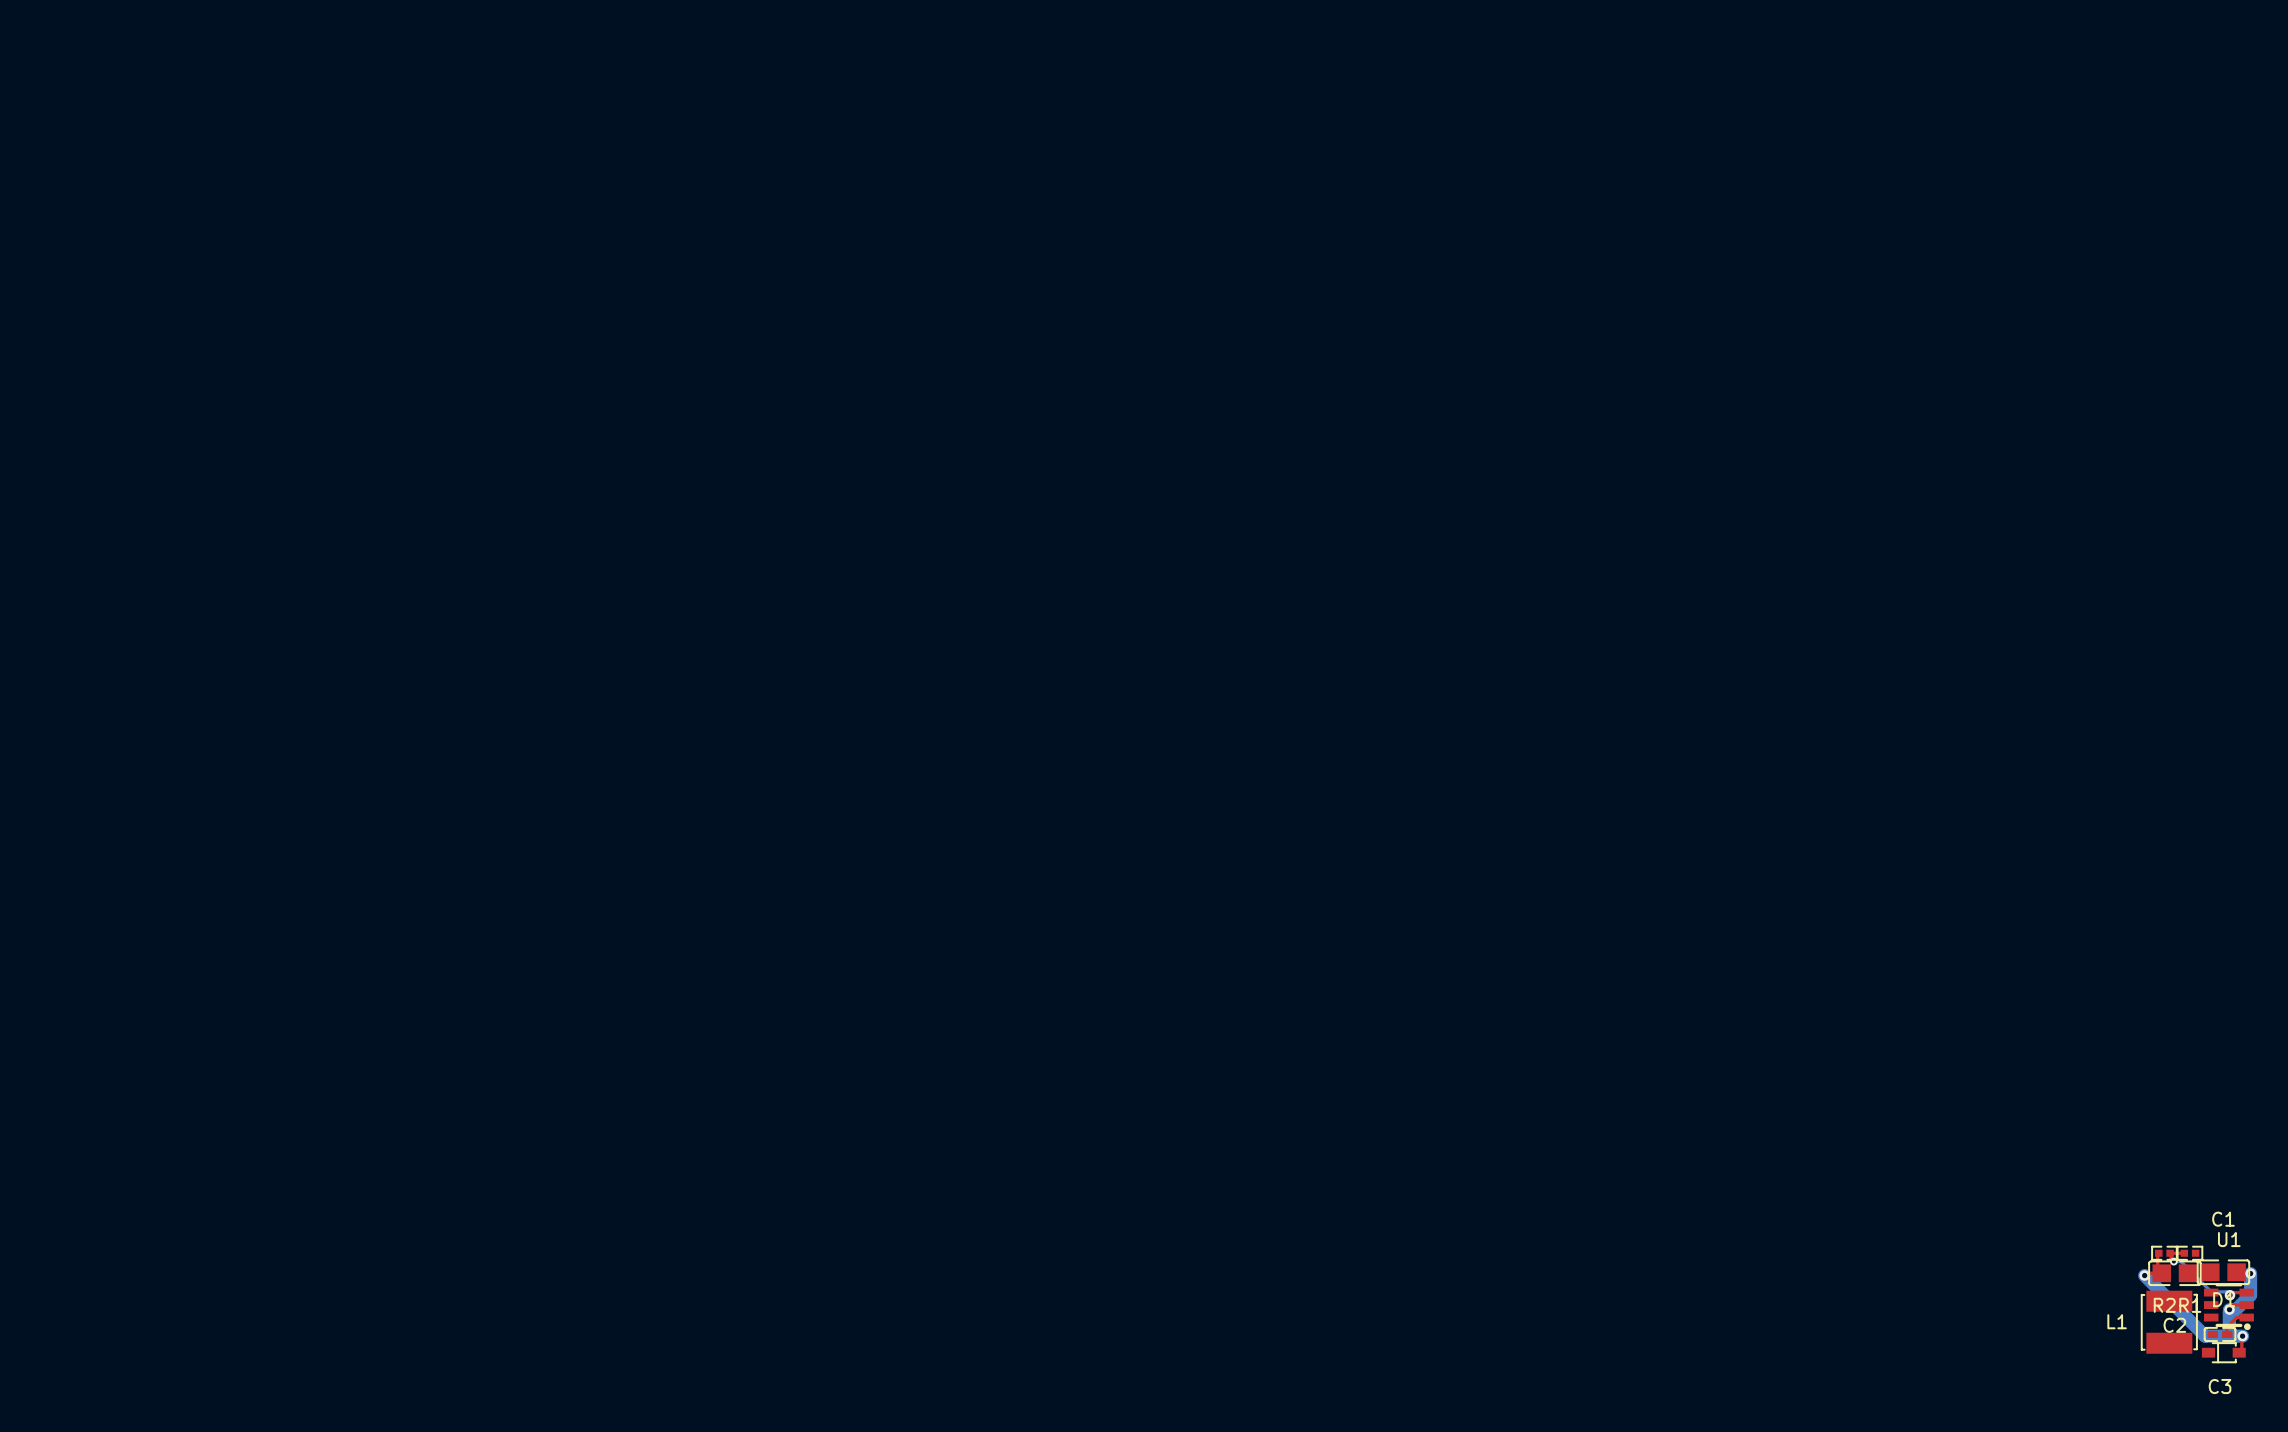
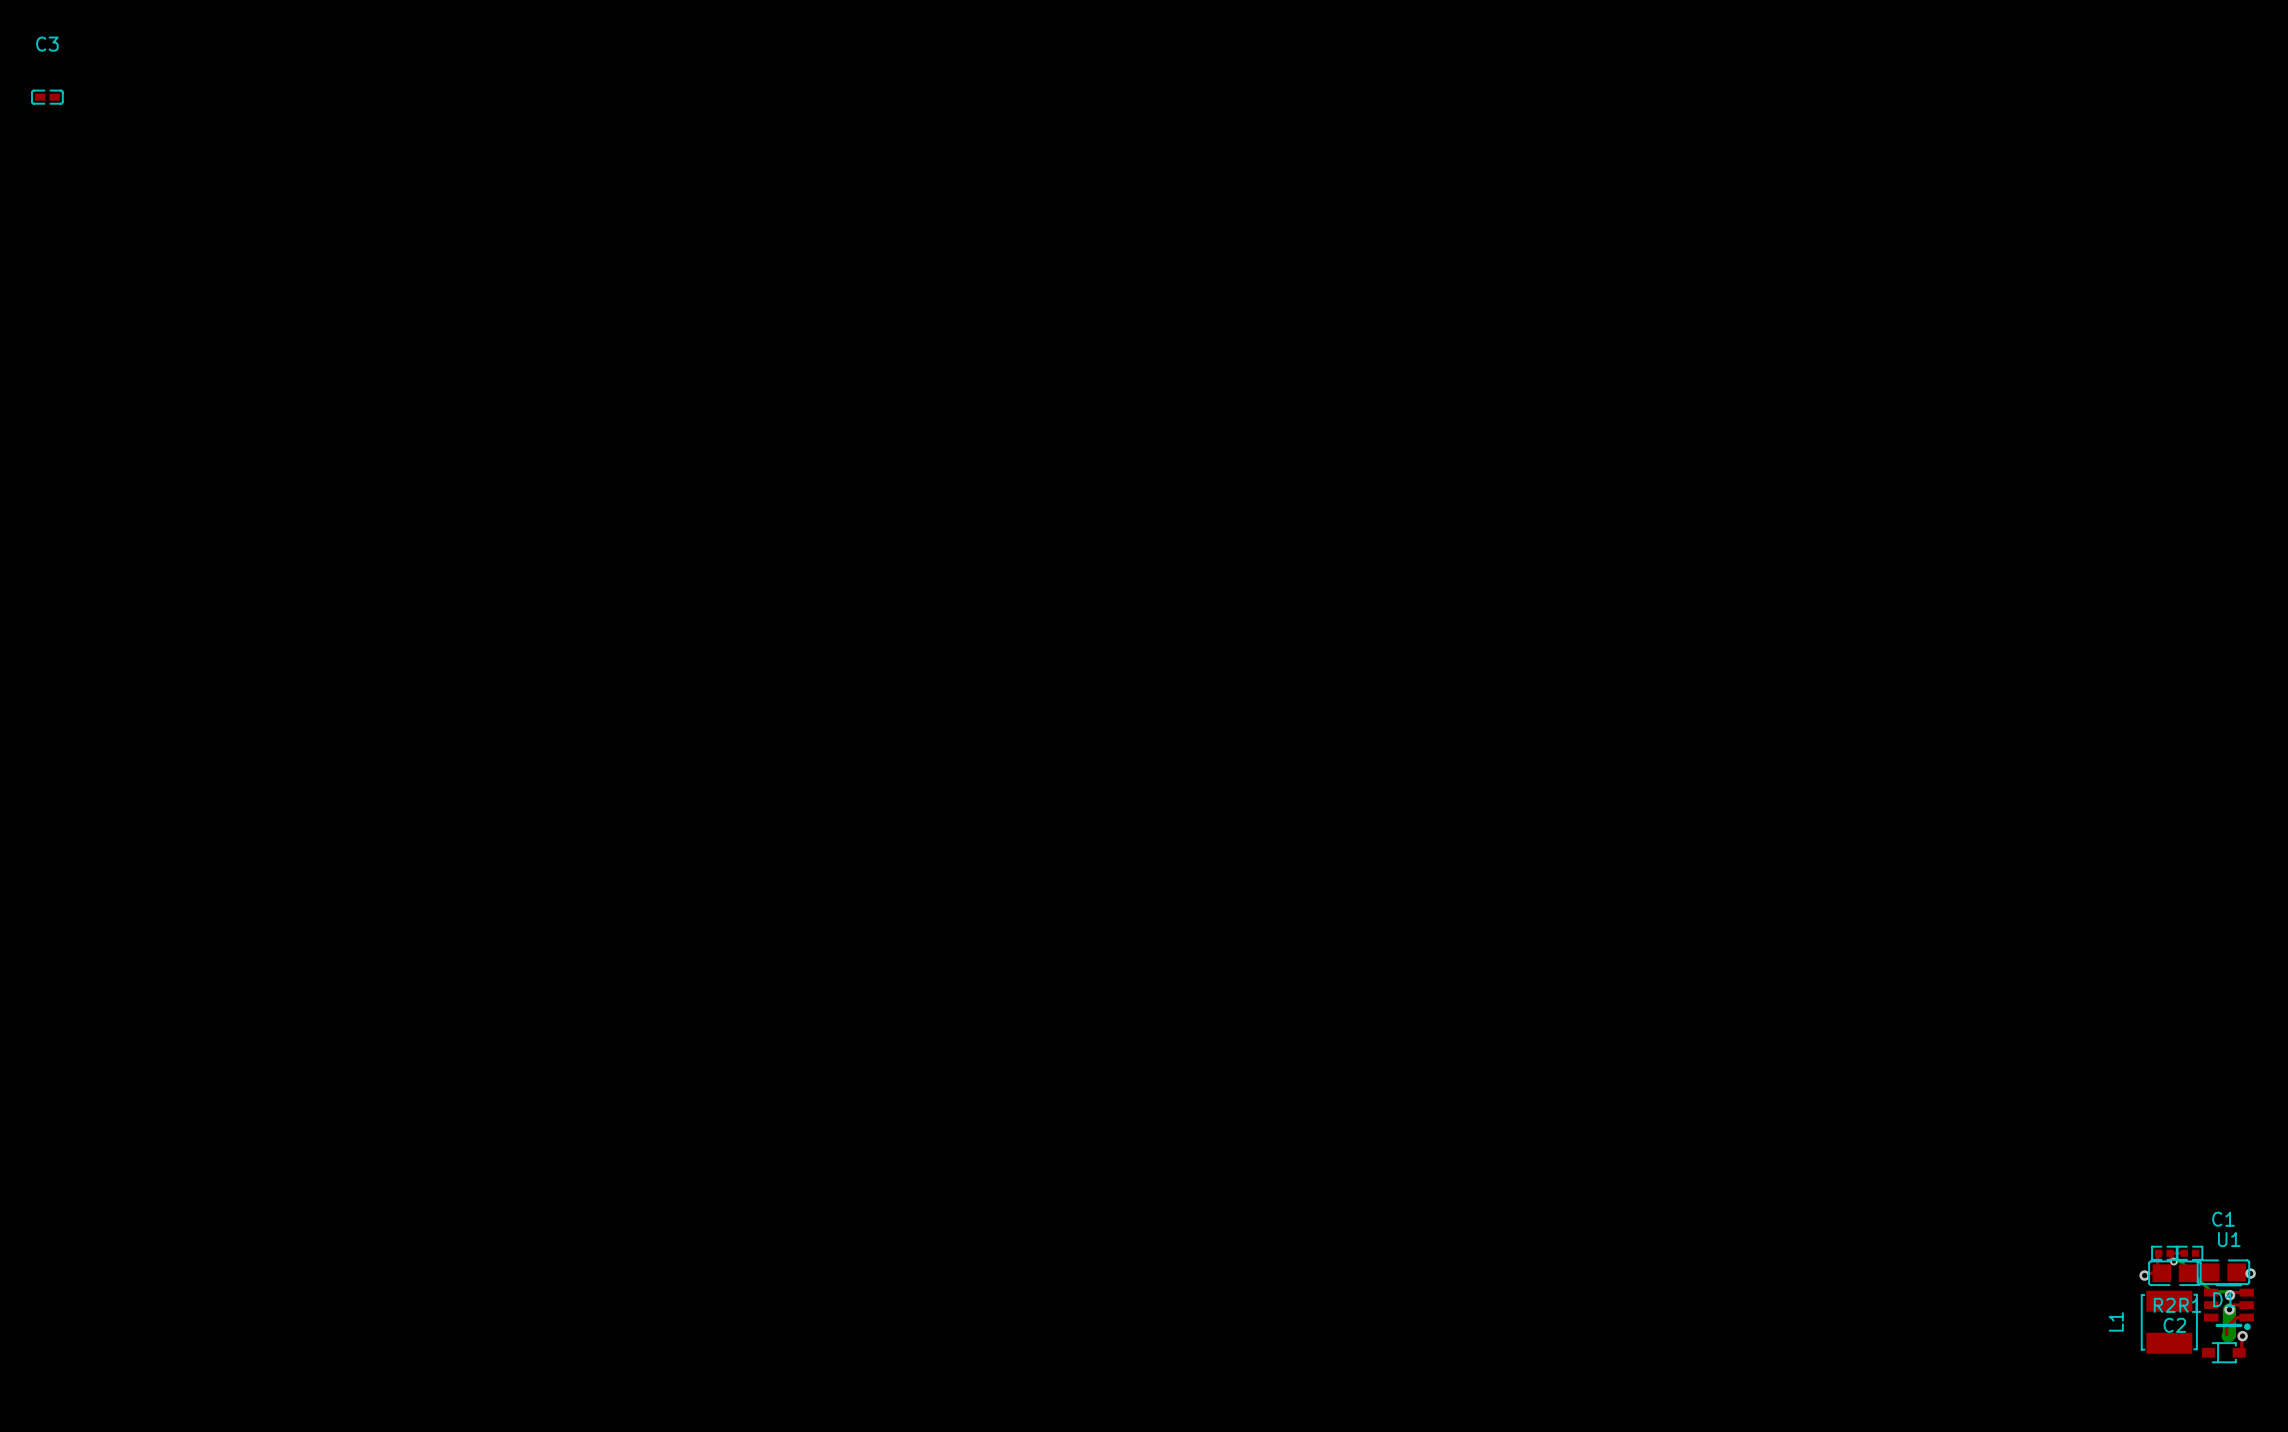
bottom track: (2250, 1273) (2250, 1295) (2235, 1309) (2229, 1312) -> none
bottom track: (2144, 1275) (2205, 1336) (2242, 1336) -> none
L1 name rotation: 0° (2117, 1321) -> 90° counterclockwise (2116, 1321)
C3 position: (2220, 1334) -> (47, 97)
C3 name position: C3 (2220, 1386) -> C3 (47, 44)

